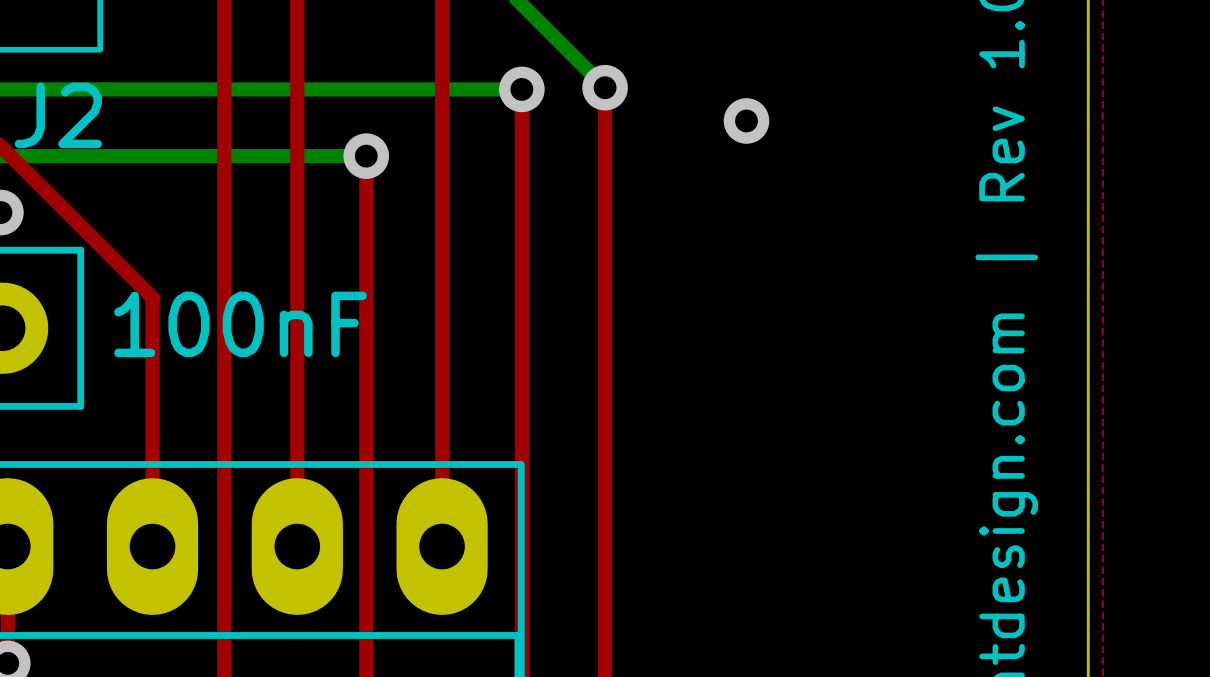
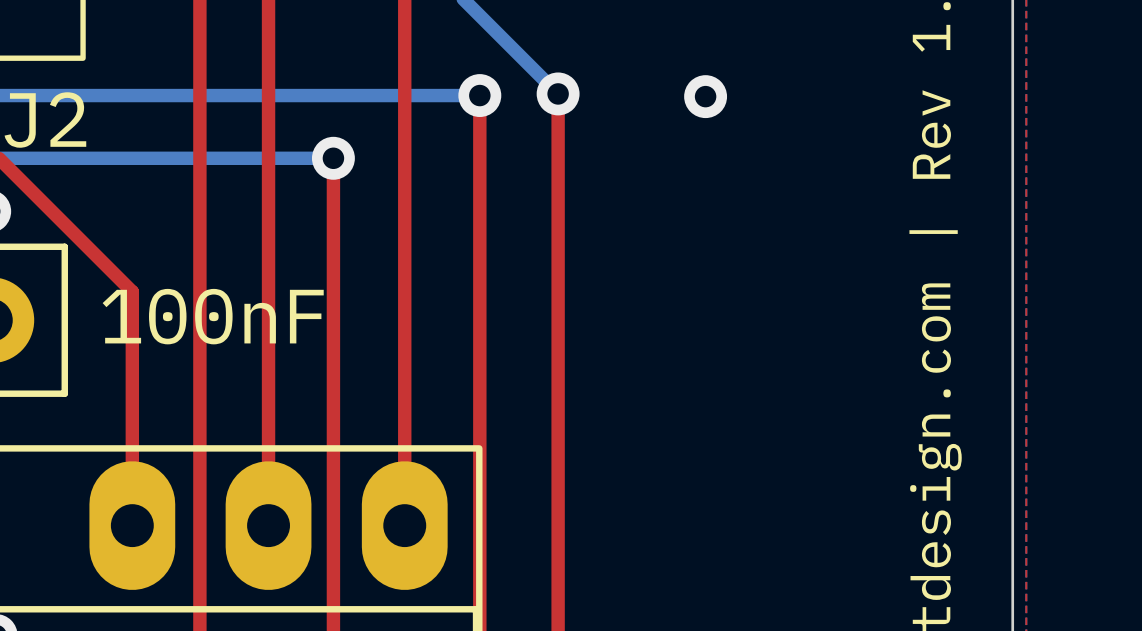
via position: (746, 120) -> (705, 96)

